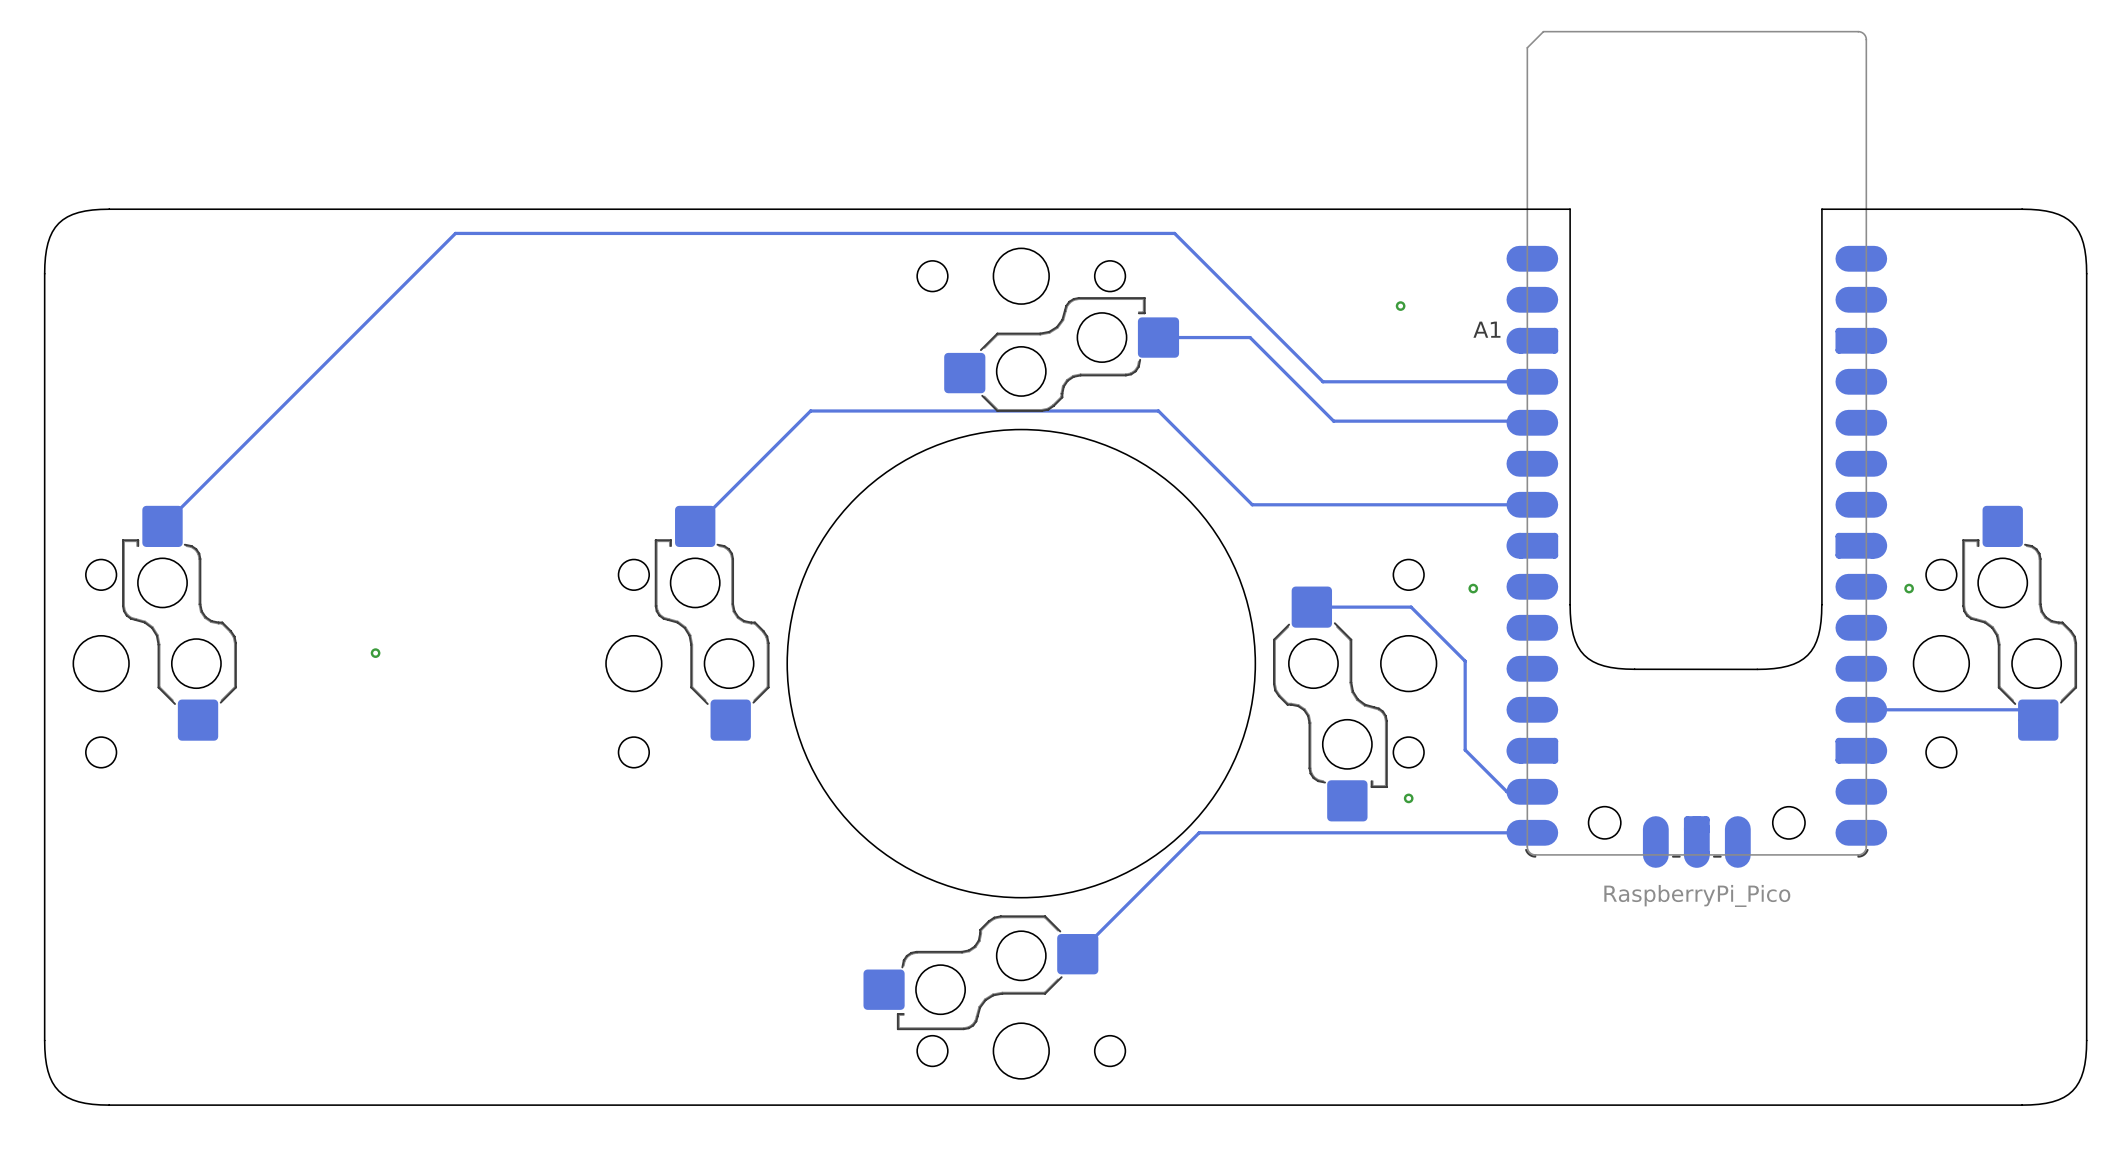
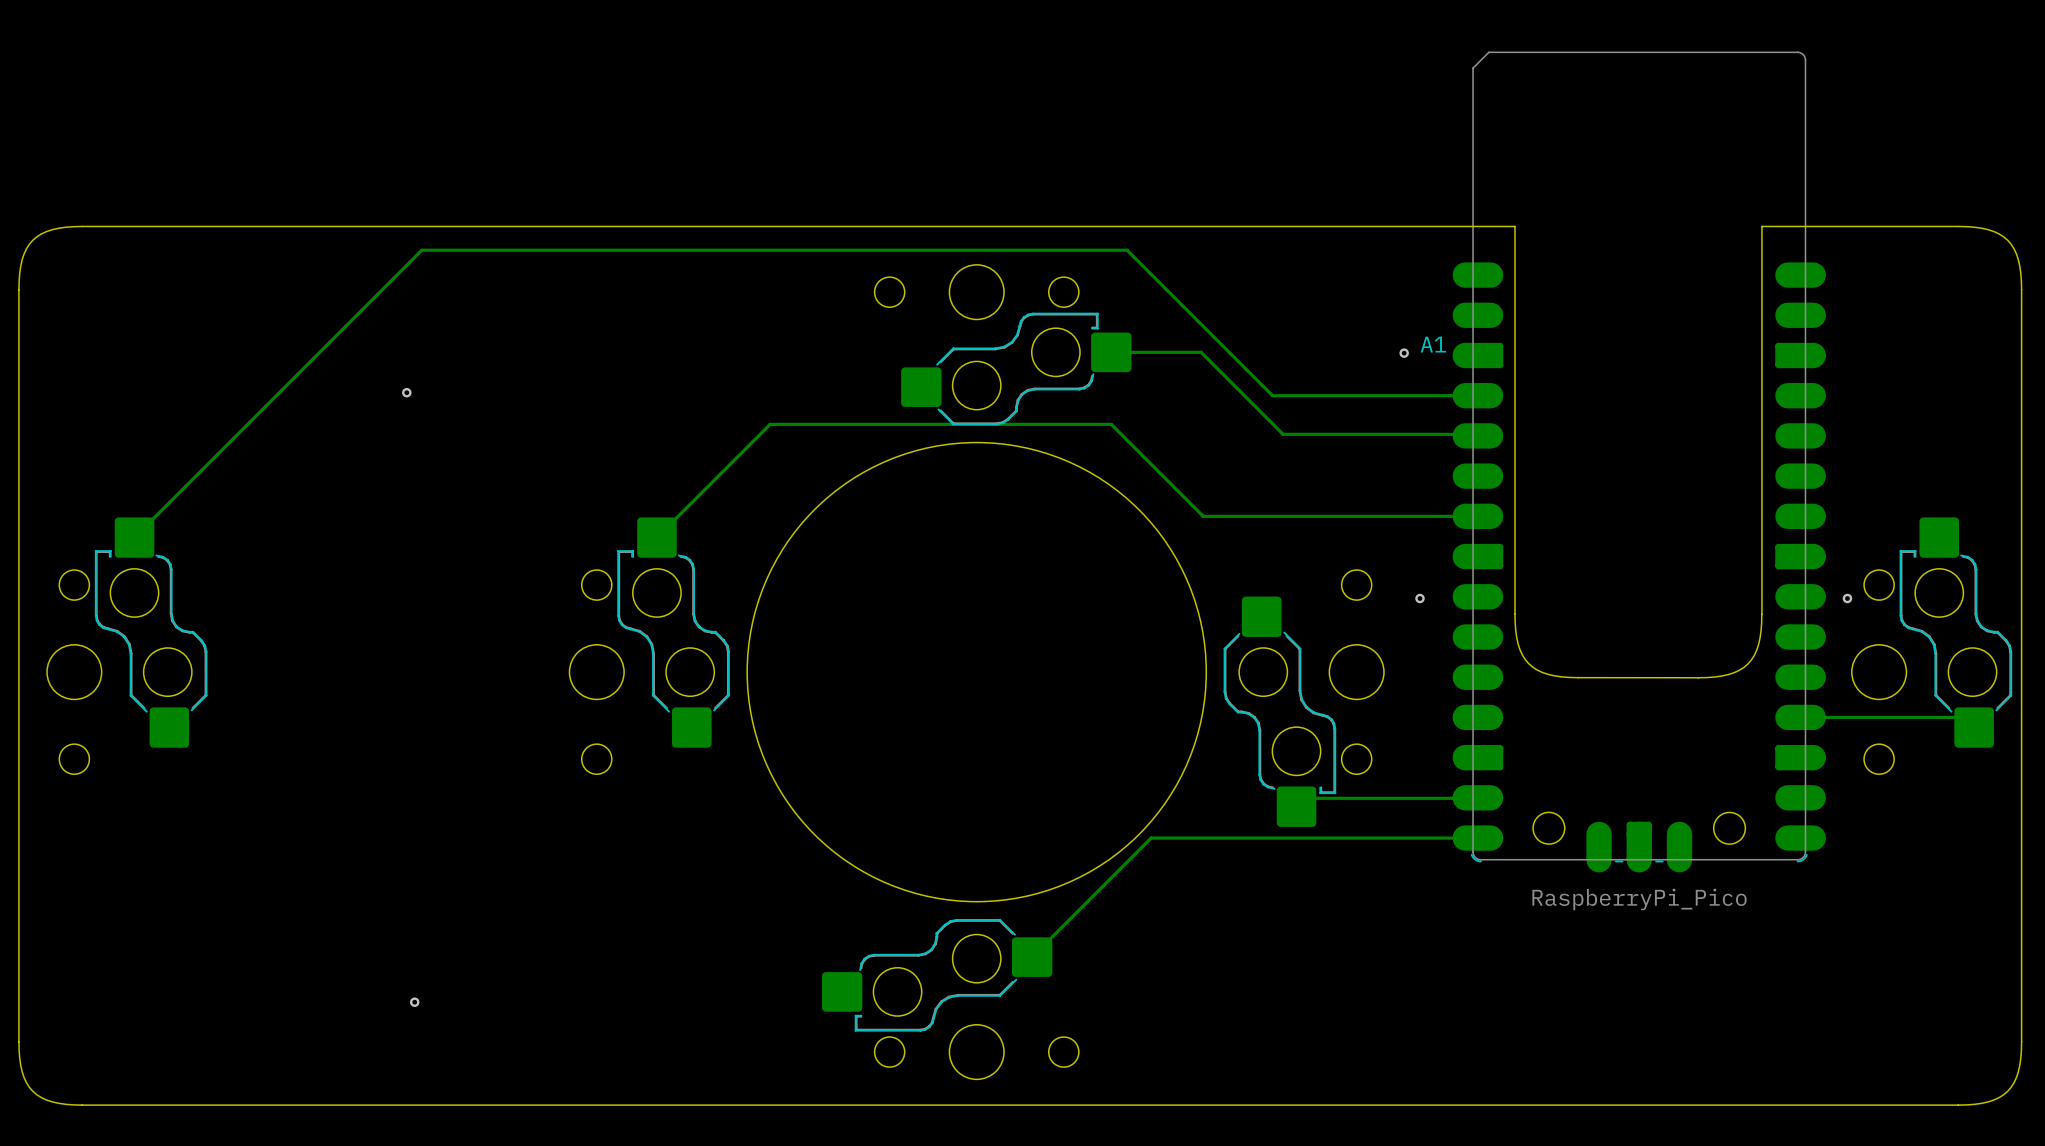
via position: (1400, 306) -> (1404, 353)
via: none -> (406, 392)
track: (1311, 607) (1411, 607) (1465, 661) (1465, 749) (1507, 791) -> none
via: (375, 653) -> none
track: none -> (1477, 797) (1304, 798) (1296, 806)
via: (1408, 798) -> none
via: none -> (414, 1002)

